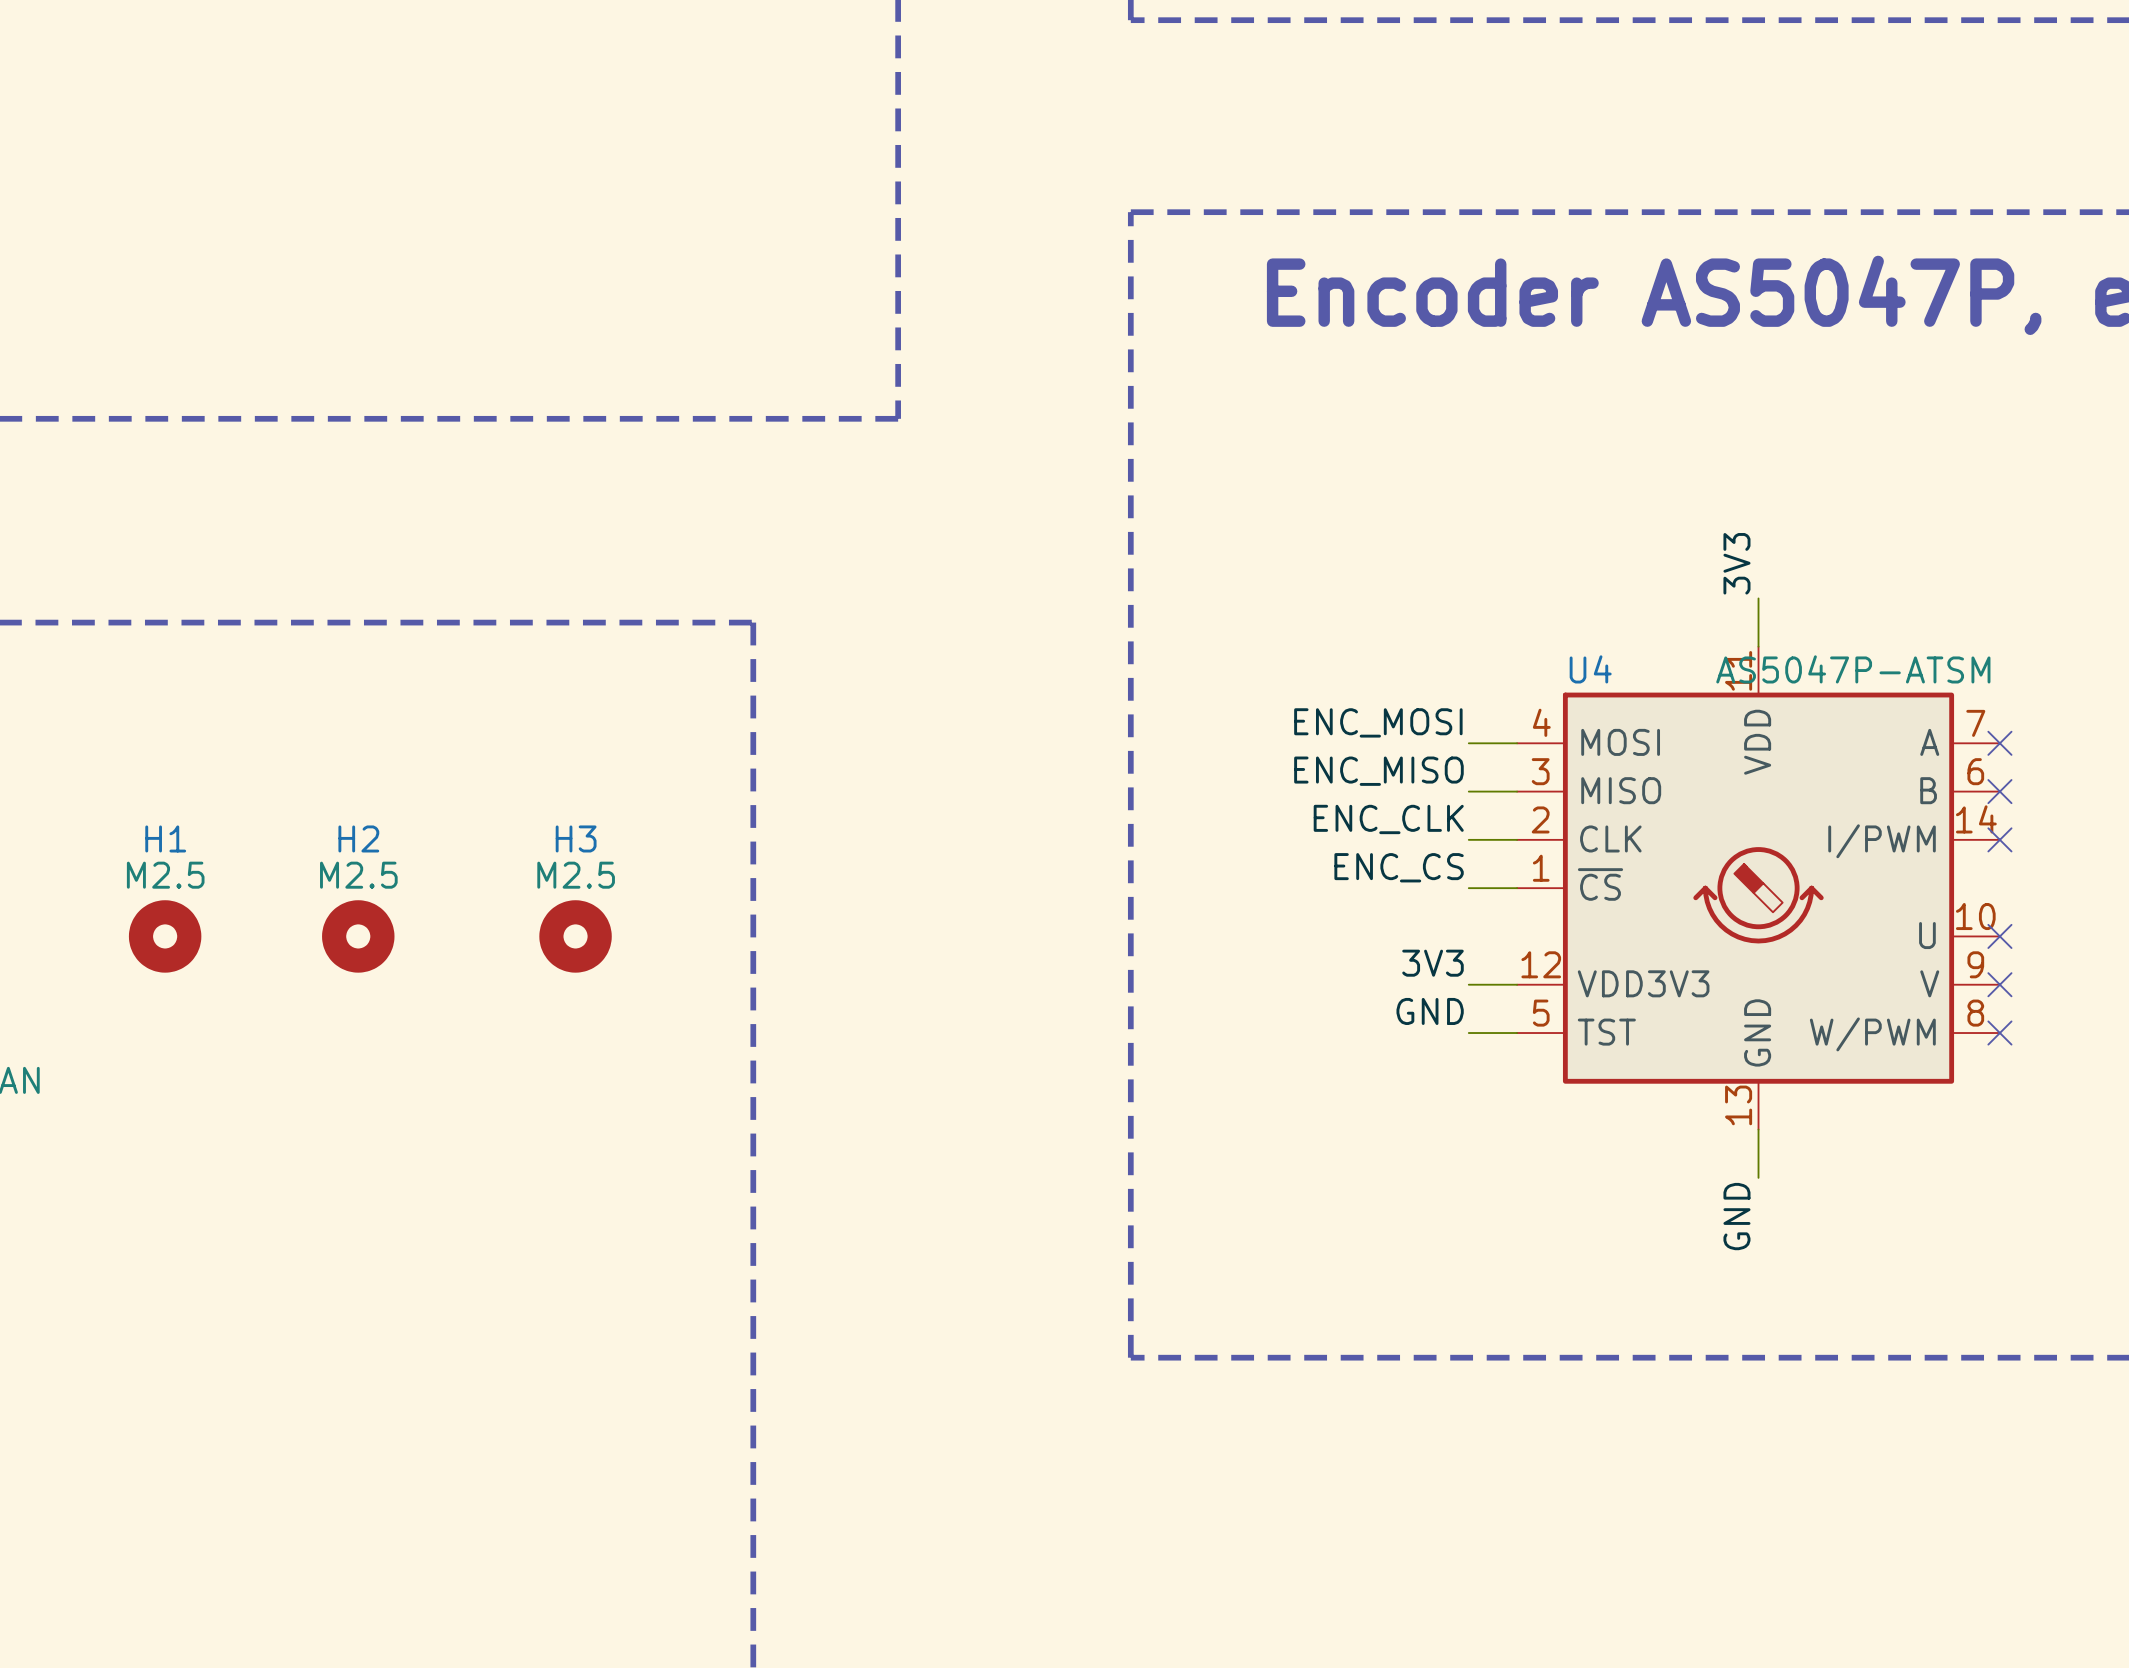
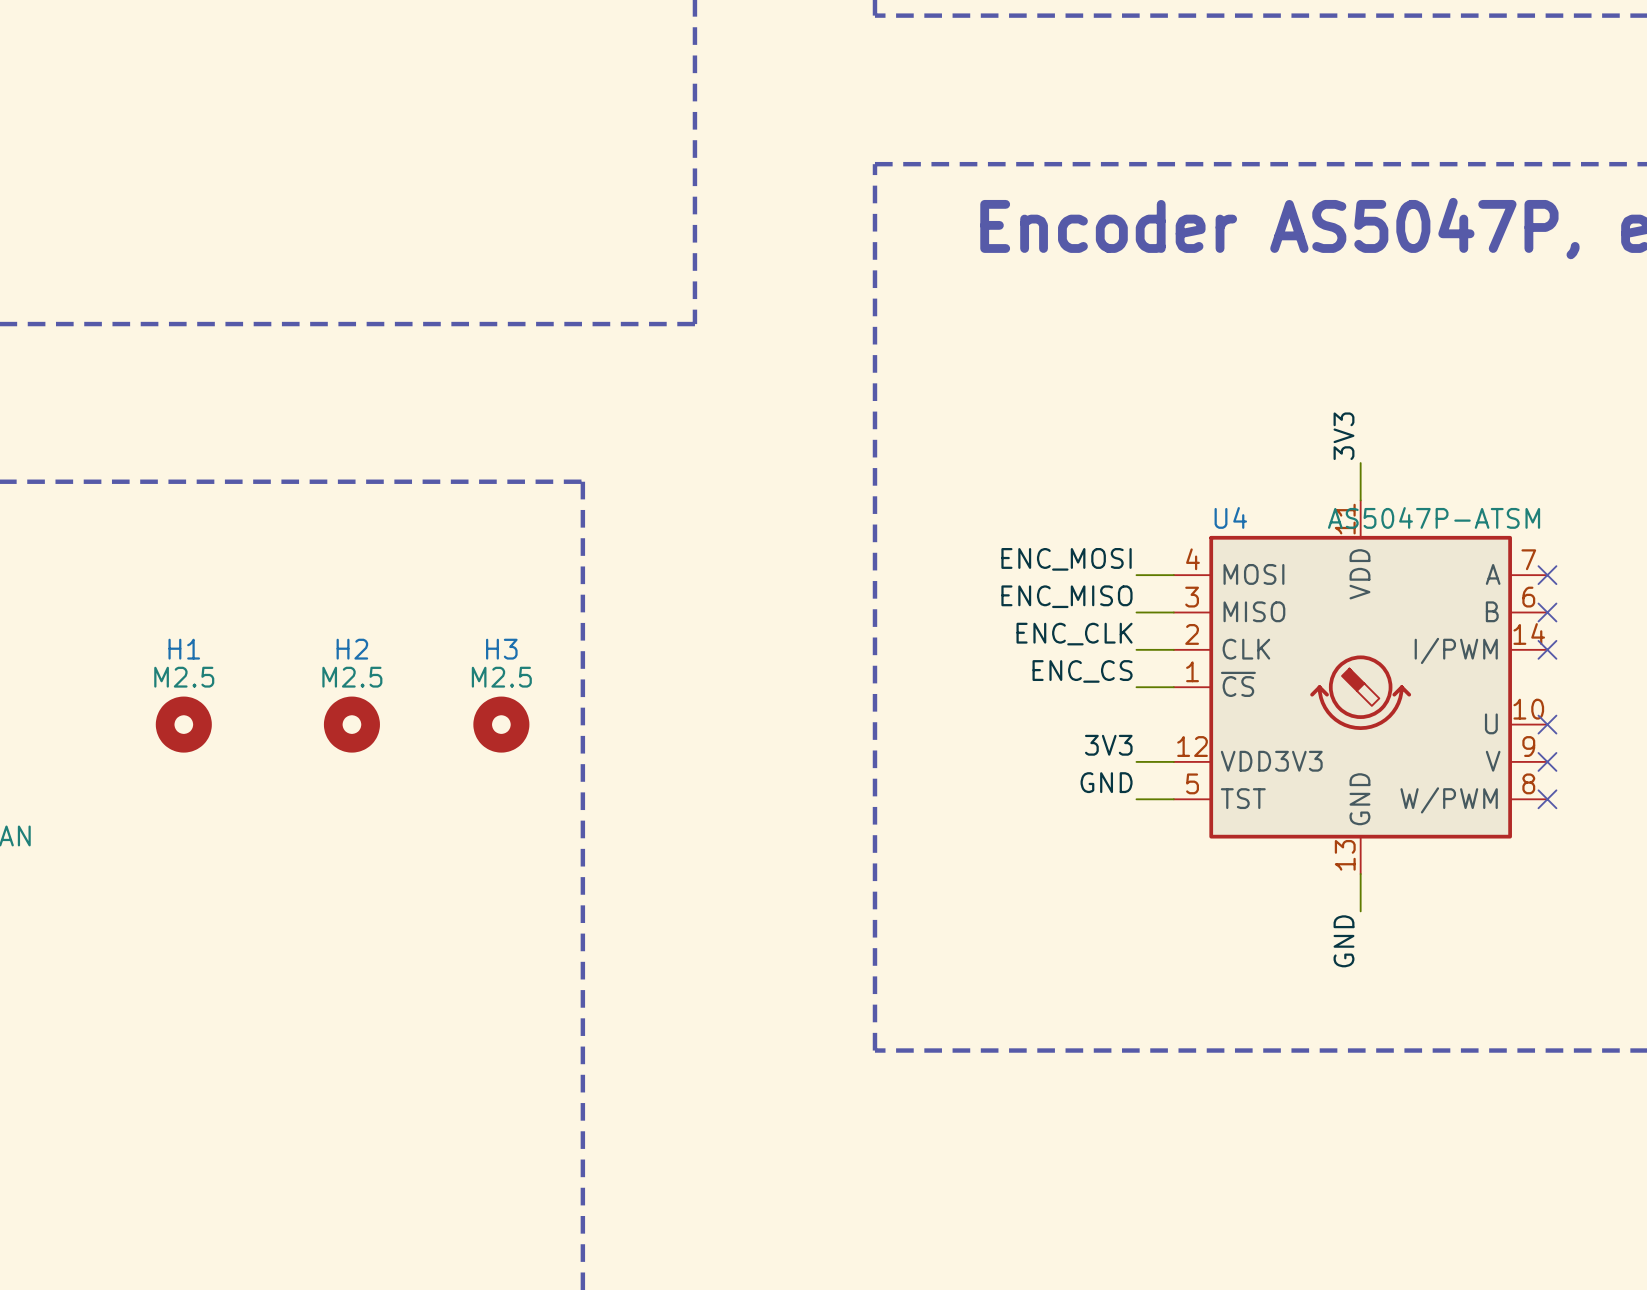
H1 position: (165, 936) -> (183, 724)
H2 position: (358, 936) -> (351, 724)
H3 position: (575, 936) -> (501, 724)

